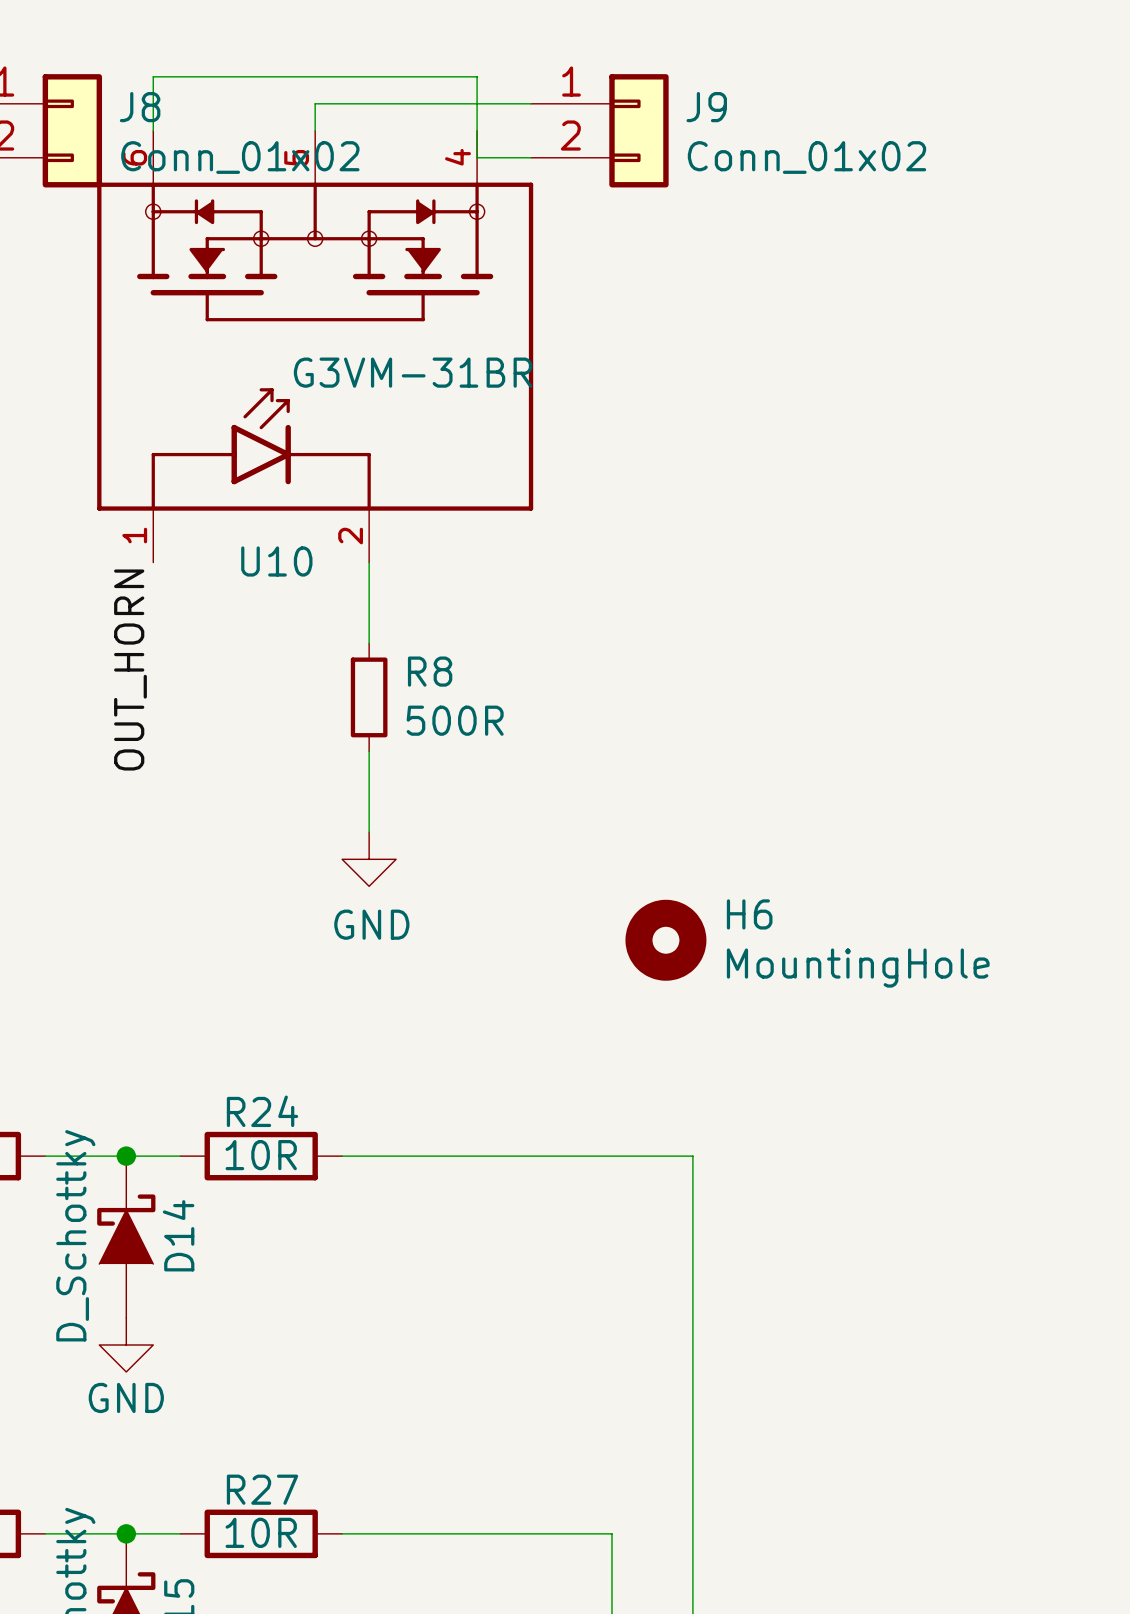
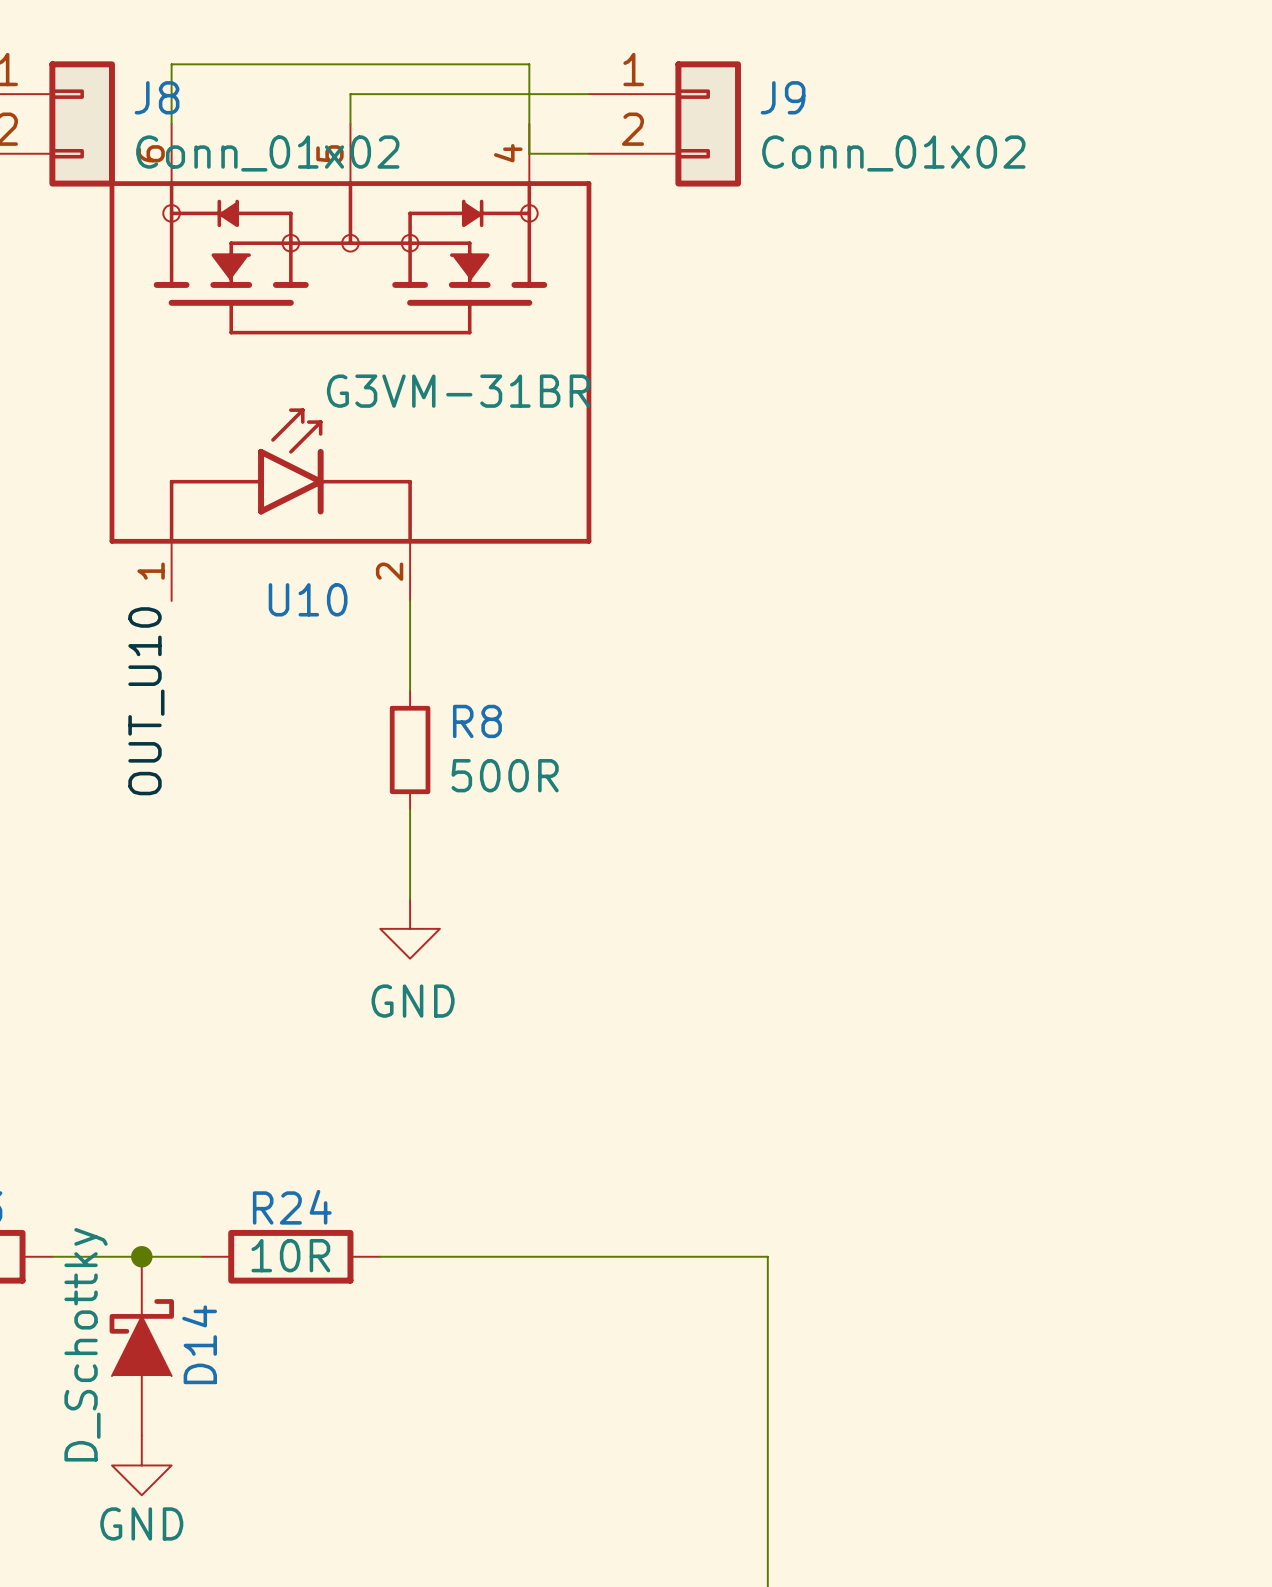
label: OUT_HORN (130, 670) -> OUT_U10 (146, 701)
H6: MountingHole (665, 940) -> none

